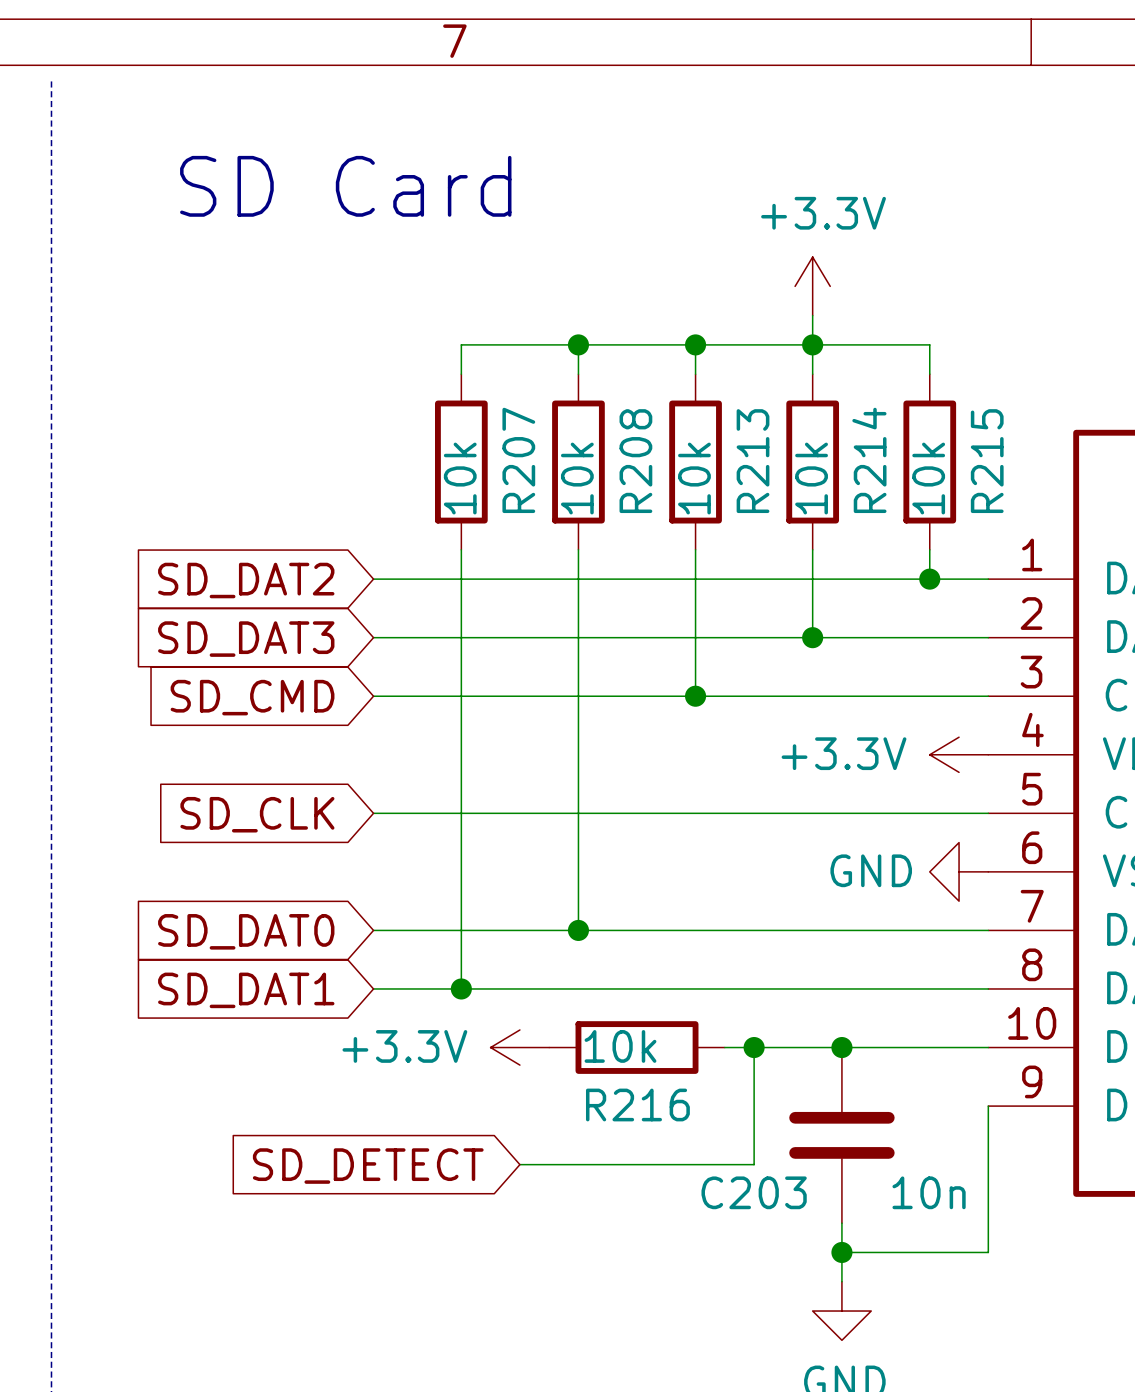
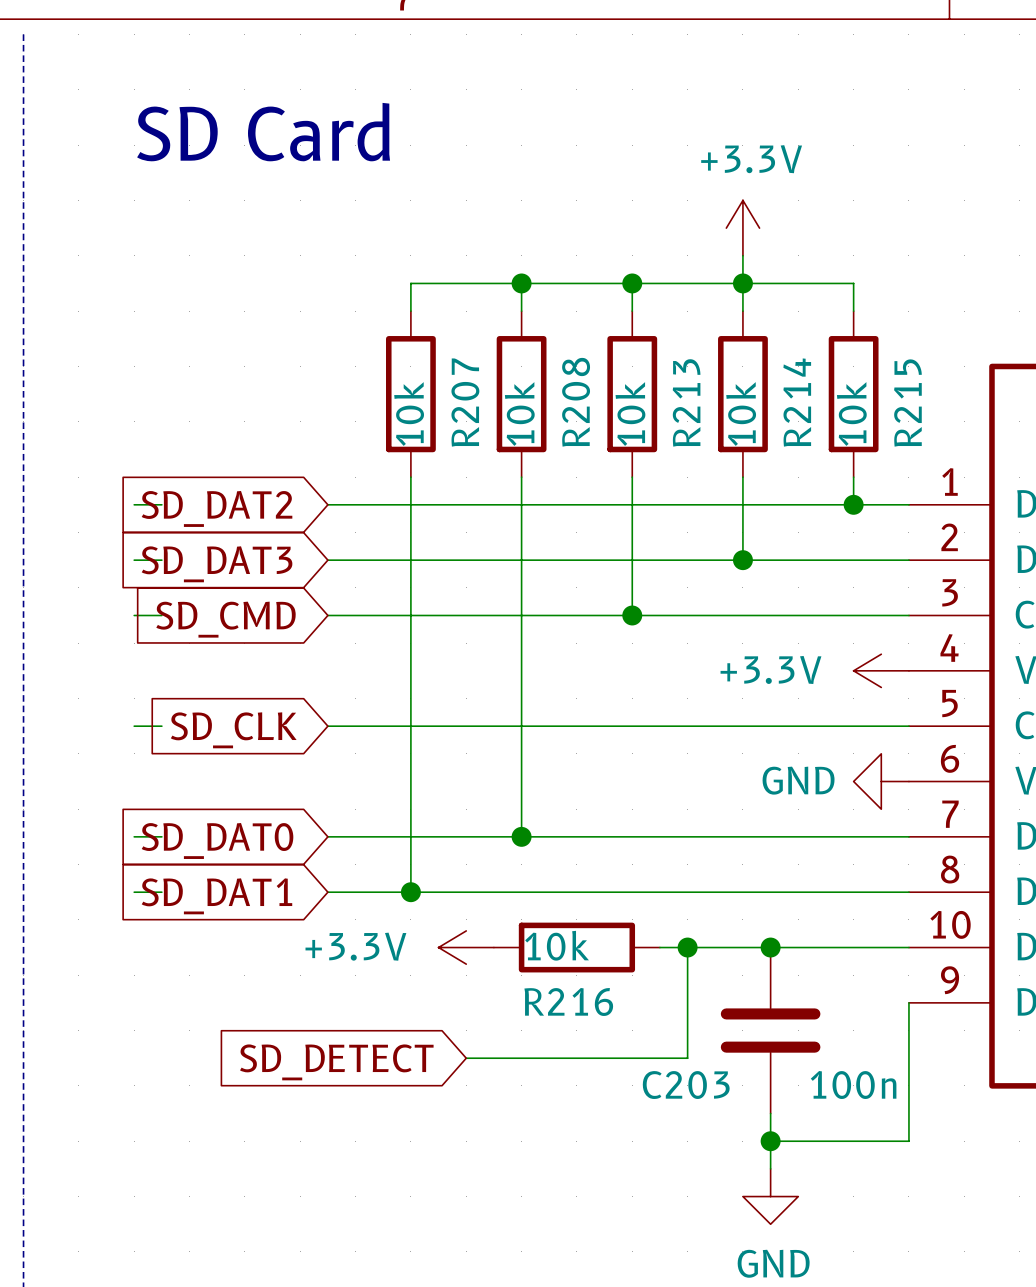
wire: none -> (134, 504) (161, 504)
wire: none -> (134, 560) (161, 560)
wire: none -> (134, 615) (161, 615)
wire: none -> (134, 726) (161, 726)
wire: none -> (134, 836) (161, 836)
wire: none -> (134, 892) (161, 892)
C203 value: 10n (929, 1192) -> 100n (853, 1085)

